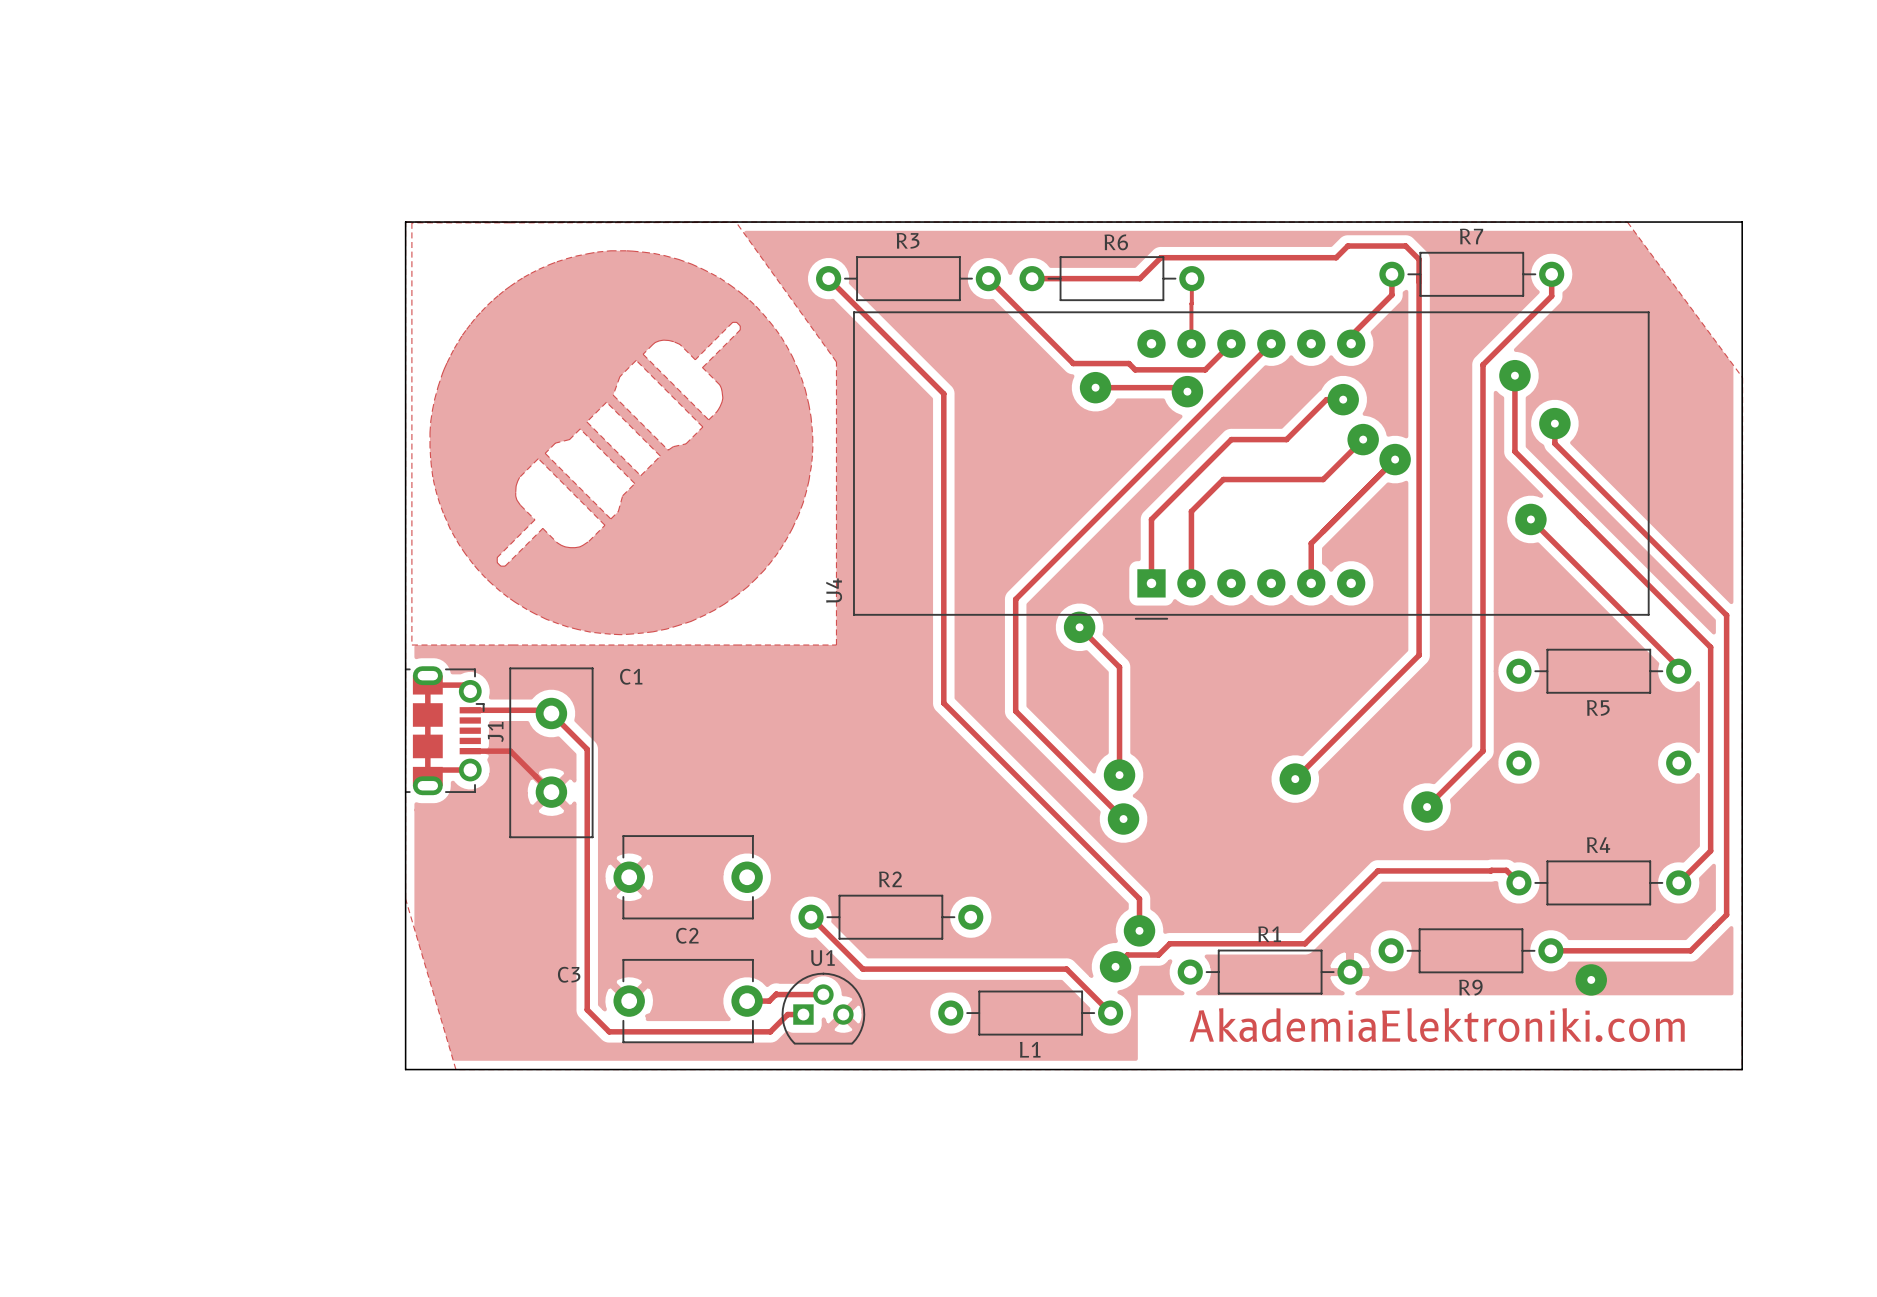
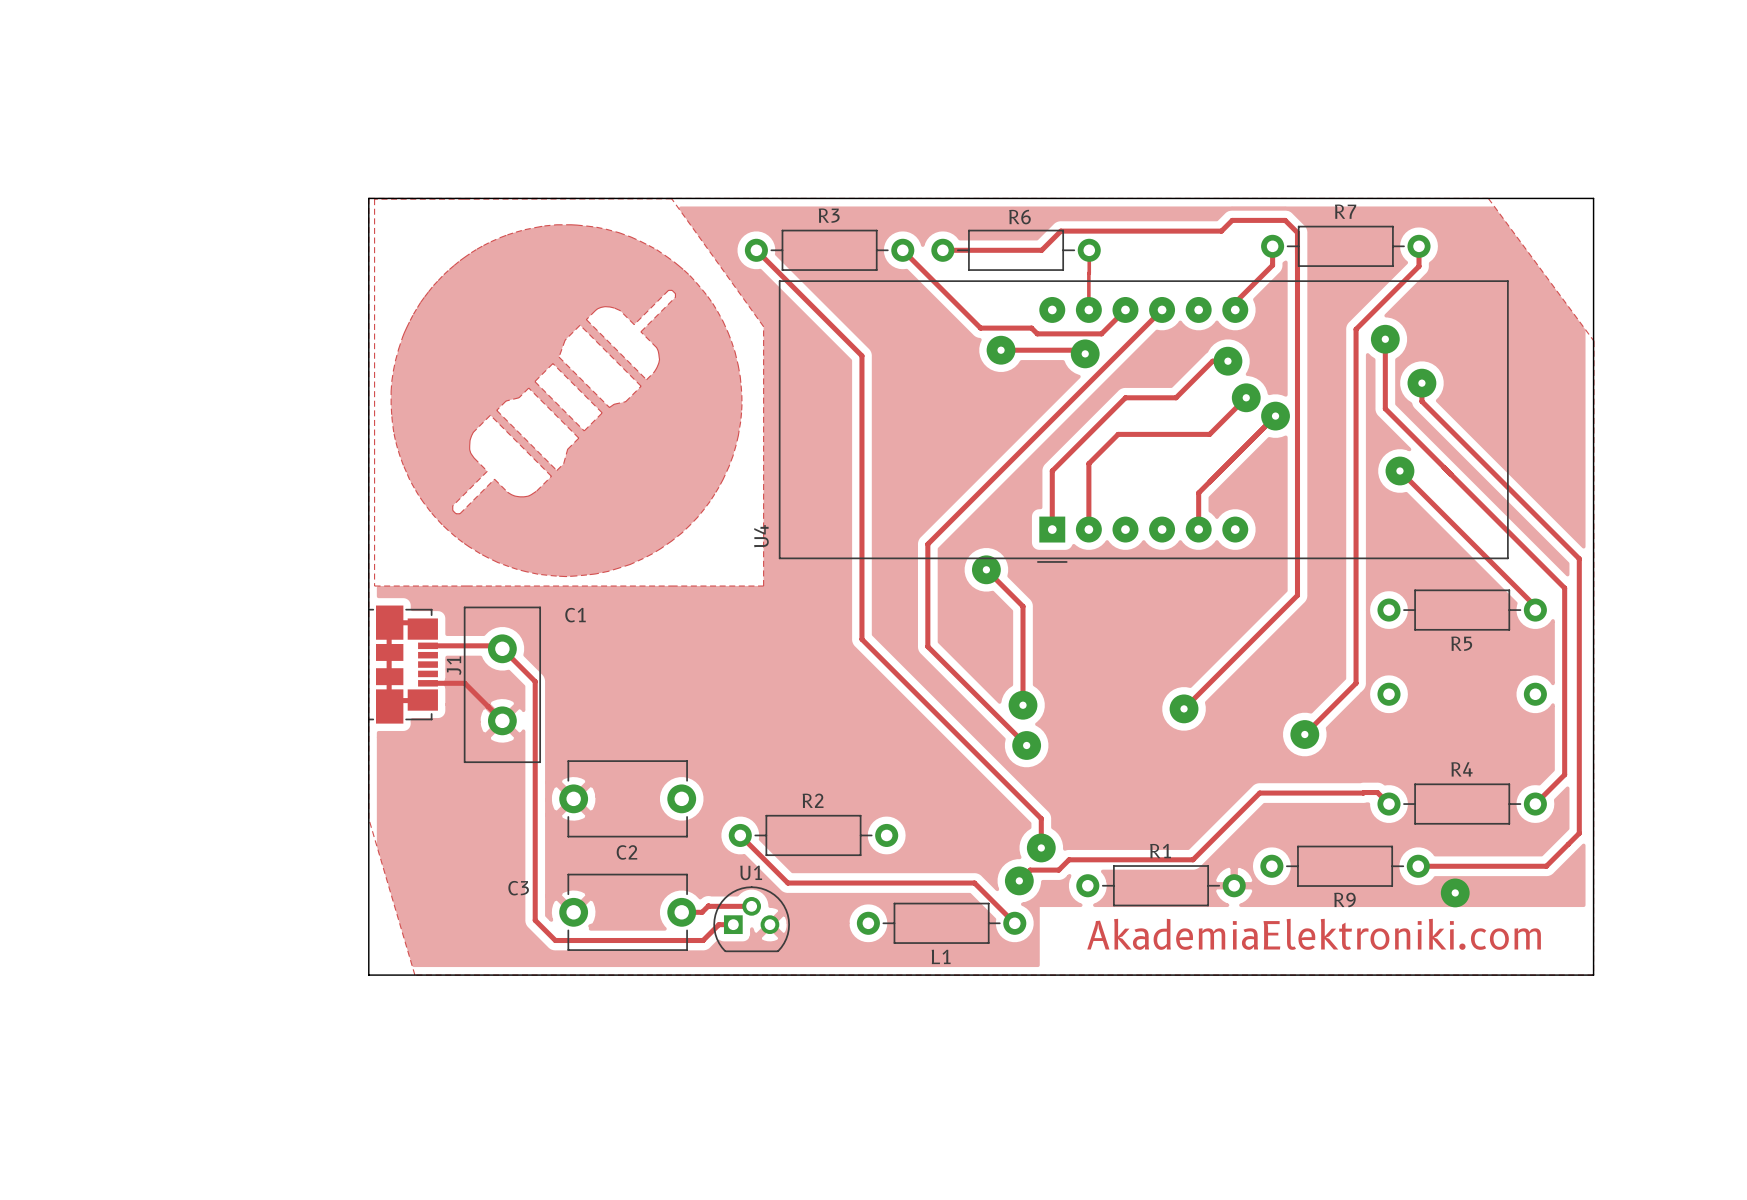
J1 footprint: [404, 666, 485, 796] -> [368, 605, 438, 724]

